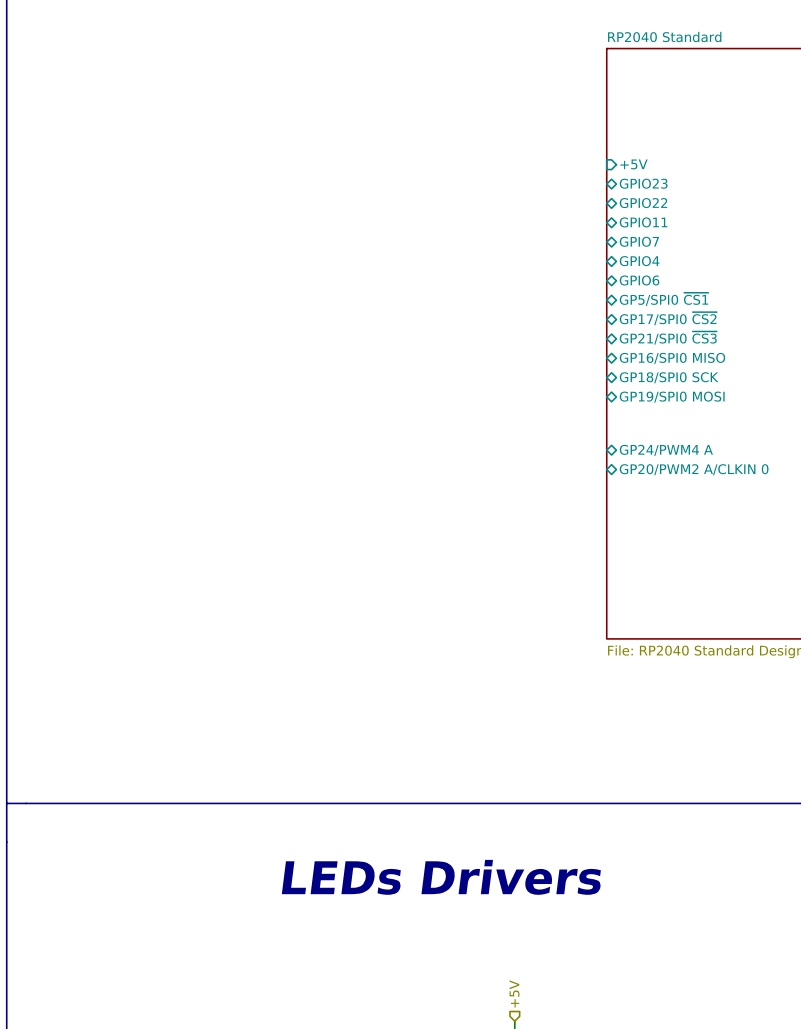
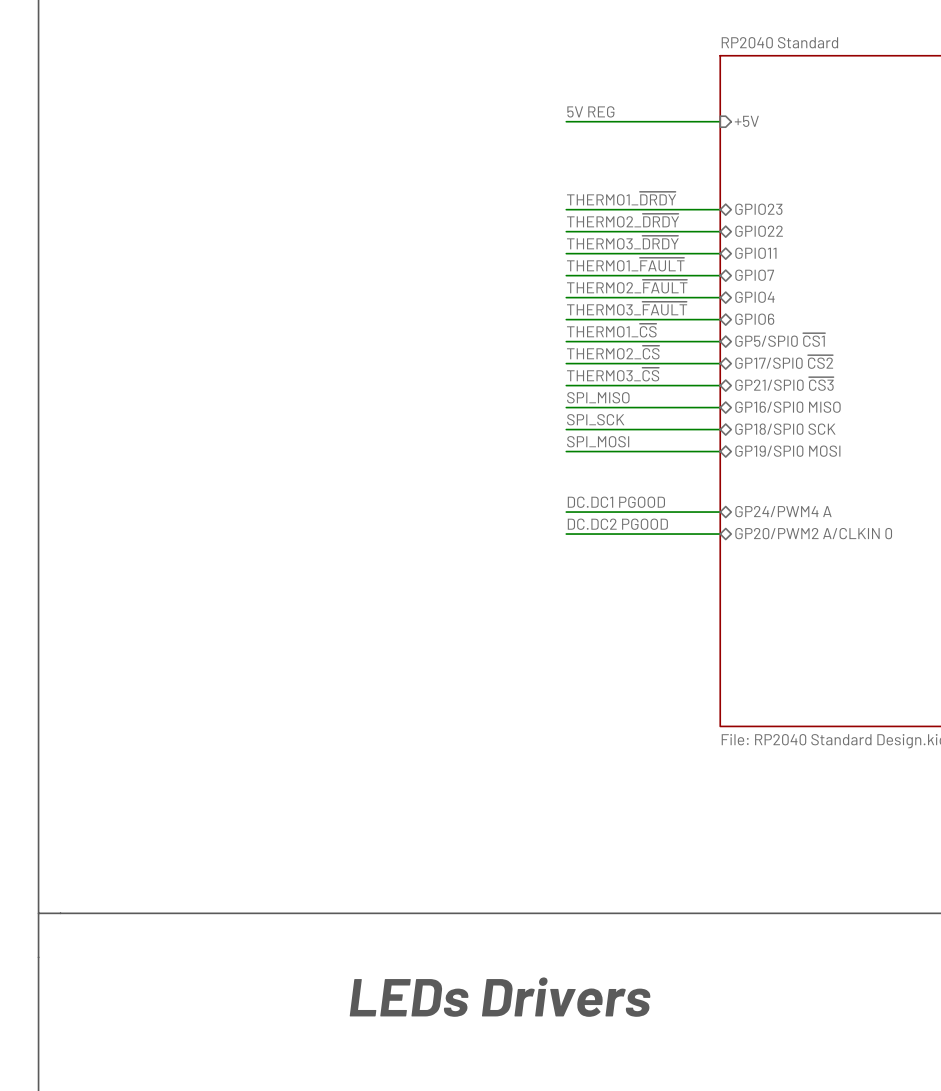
label: none -> 5V REG (590, 111)
wire: none -> (566, 121) (720, 121)
sheet pin position: +5V (634, 164) -> +5V (746, 121)
label: none -> THERMO1_~{DRDY} (621, 198)
wire: none -> (566, 209) (720, 209)
label: none -> THERMO2_~{DRDY} (623, 220)
wire: none -> (566, 231) (720, 231)
label: none -> THERMO3_~{DRDY} (622, 242)
wire: none -> (566, 253) (720, 253)
label: none -> THERMO1_~{FAULT} (625, 264)
wire: none -> (566, 275) (720, 275)
label: none -> THERMO2_~{FAULT} (627, 286)
wire: none -> (566, 297) (720, 297)
label: none -> THERMO3_~{FAULT} (627, 308)
wire: none -> (566, 319) (720, 319)
label: none -> THERMO1_~{CS} (611, 330)
wire: none -> (566, 341) (720, 341)
label: none -> THERMO2_~{CS} (613, 352)
wire: none -> (566, 363) (720, 363)
label: none -> THERMO3_~{CS} (613, 374)
wire: none -> (566, 385) (720, 385)
label: none -> SPI_MISO (598, 397)
wire: none -> (566, 407) (720, 407)
label: none -> SPI_SCK (595, 419)
wire: none -> (566, 429) (720, 429)
label: none -> SPI_MOSI (598, 441)
wire: none -> (566, 451) (720, 451)
label: none -> DC.DC1 PGOOD (616, 502)
wire: none -> (566, 512) (720, 512)
label: none -> DC.DC2 PGOOD (617, 524)
wire: none -> (566, 534) (720, 534)

